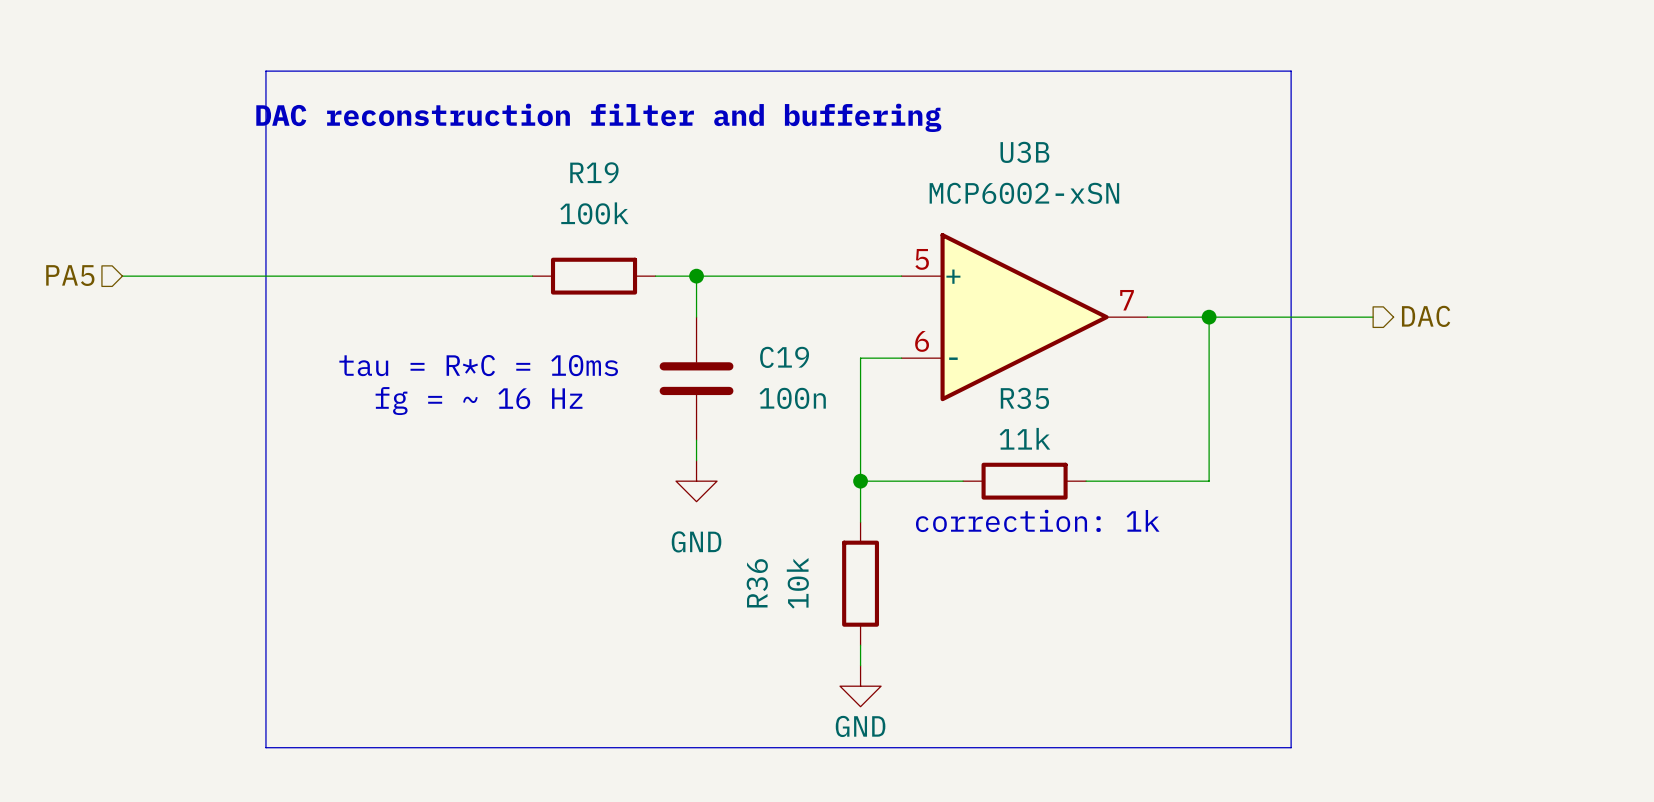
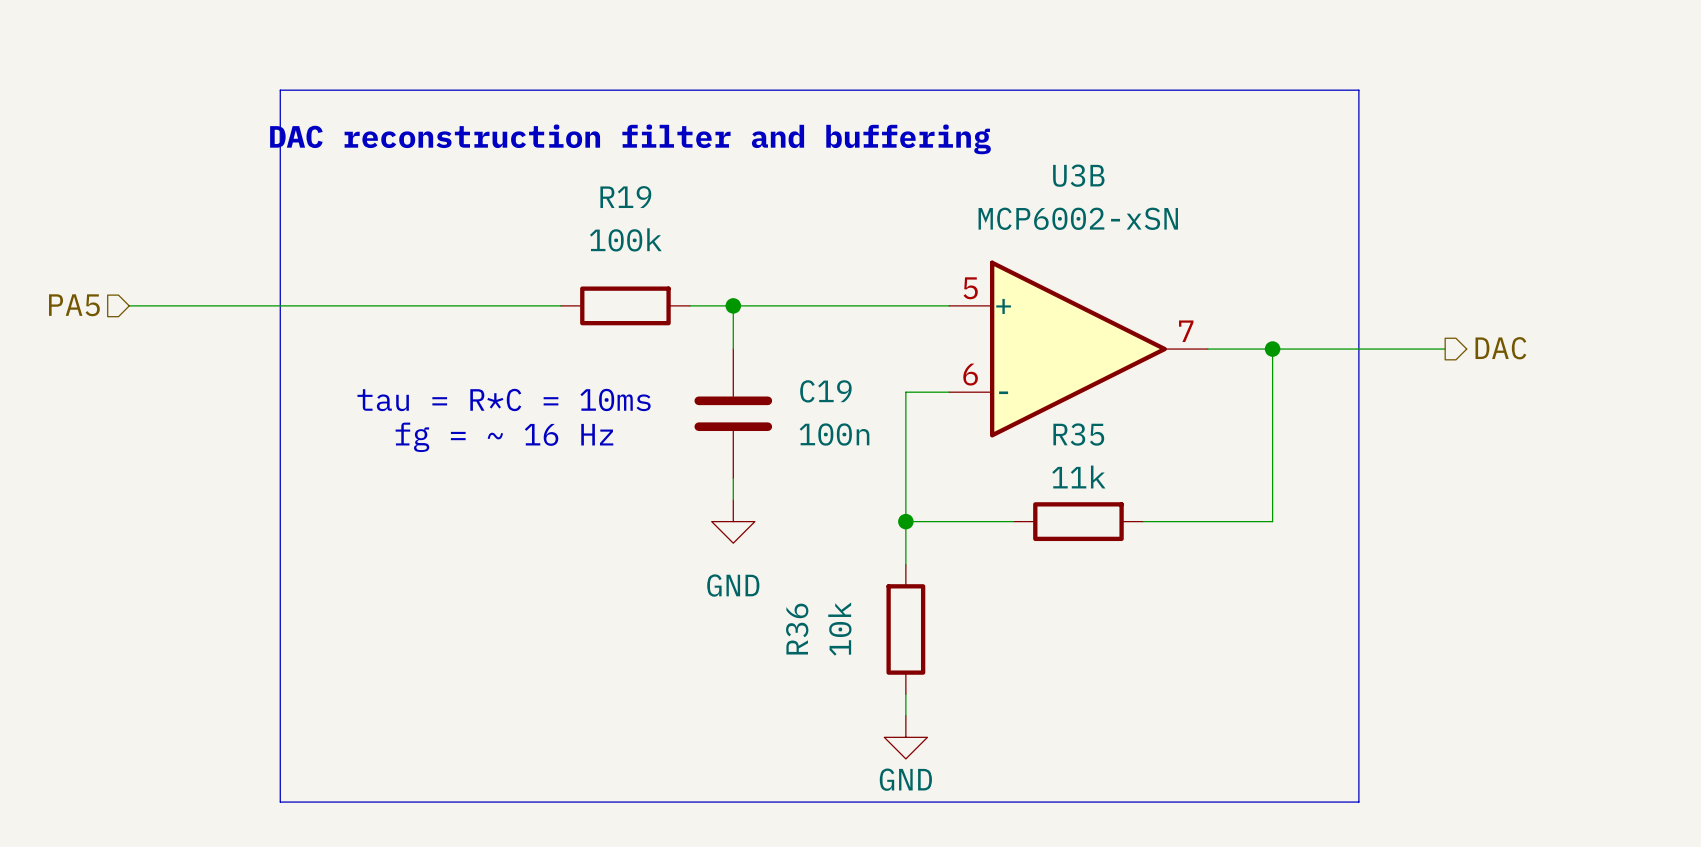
text: correction: 1k (1037, 520) -> none

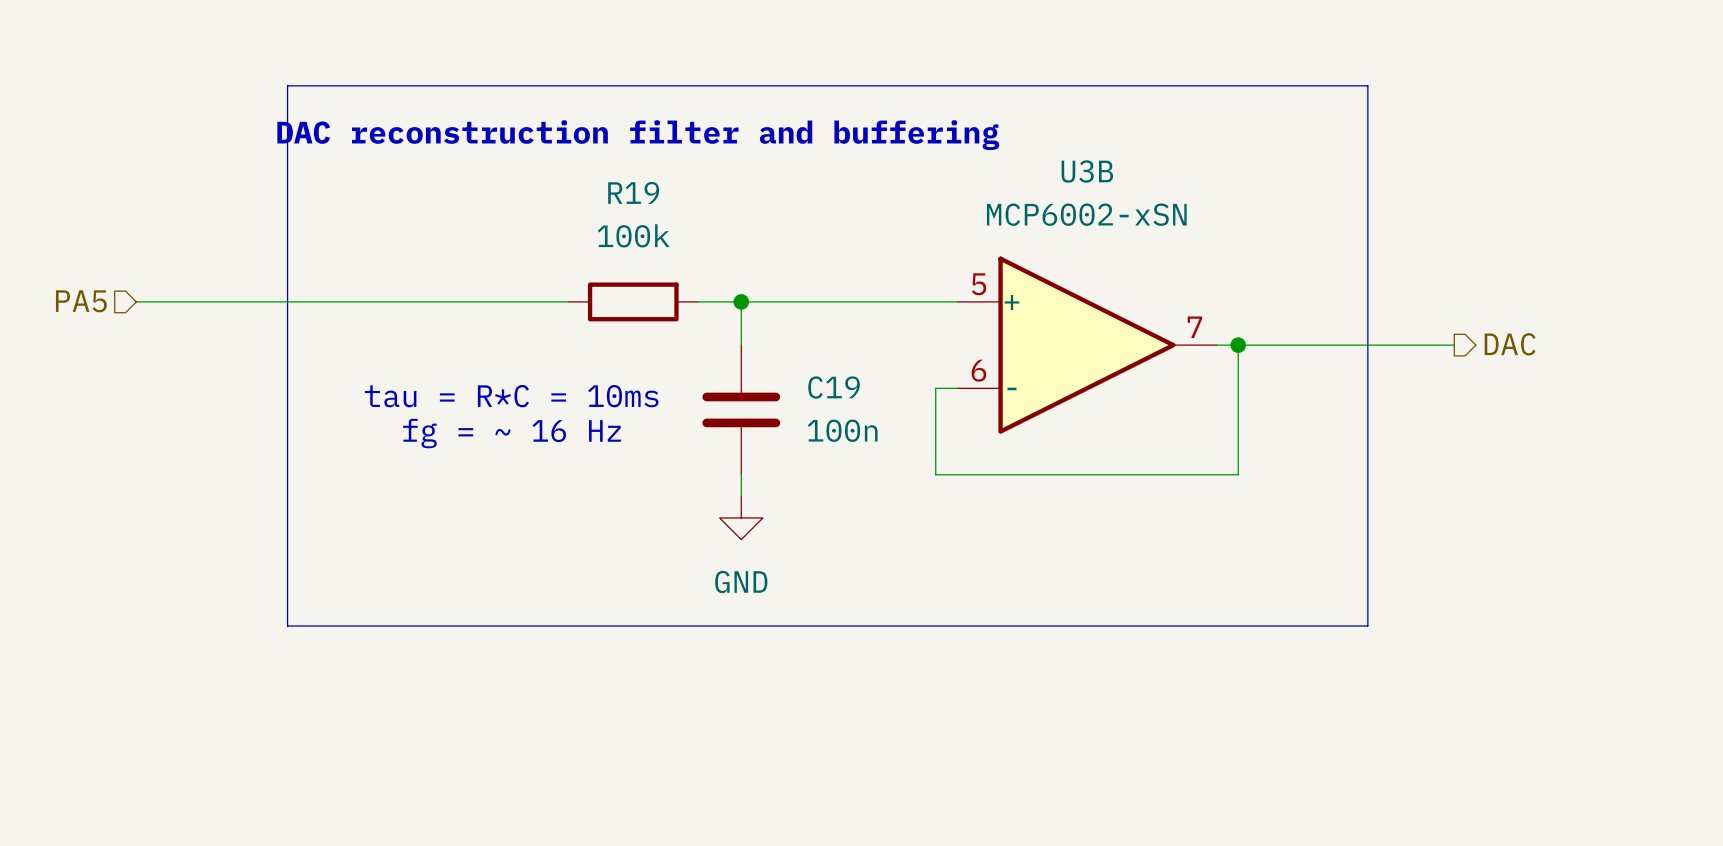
wire: (1272, 349) (1272, 521) (1143, 521) -> none
junction position: (1272, 349) -> (1238, 345)
wire: (927, 392) (905, 392) (905, 564) -> (935, 388) (935, 474) (1238, 474) (1238, 345)
wire: (905, 521) (1013, 521) -> none
junction: (905, 521) -> none
R35: 11k (1078, 521) -> none
line: (280, 629) (280, 802) (1358, 802) (1358, 629) -> (287, 626) (1367, 626)
R36: 10k (905, 629) -> none
wire: (905, 694) (905, 715) -> none
power symbol: GND (905, 737) -> none

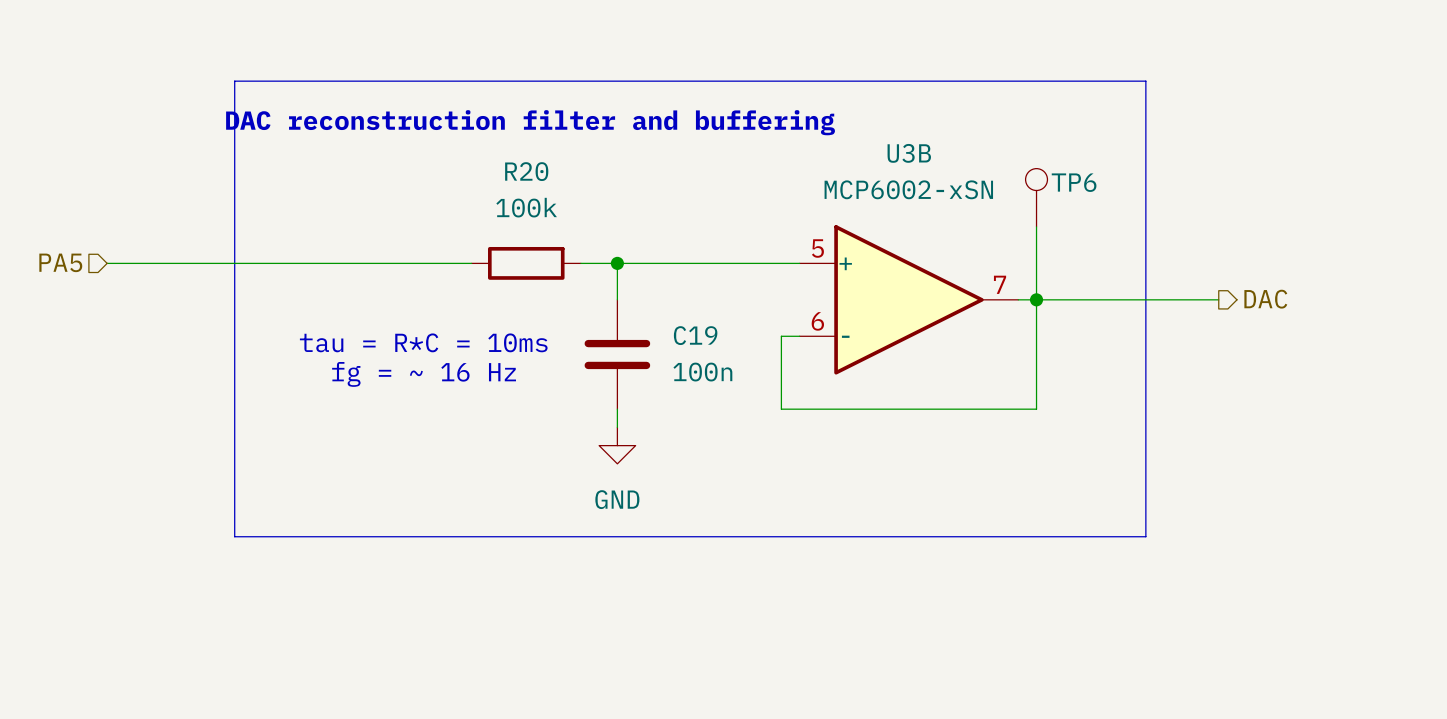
R19 name: R19 (633, 192) -> R20 (526, 171)
TP6: none -> (1036, 197)
wire: none -> (1036, 226) (1036, 299)

